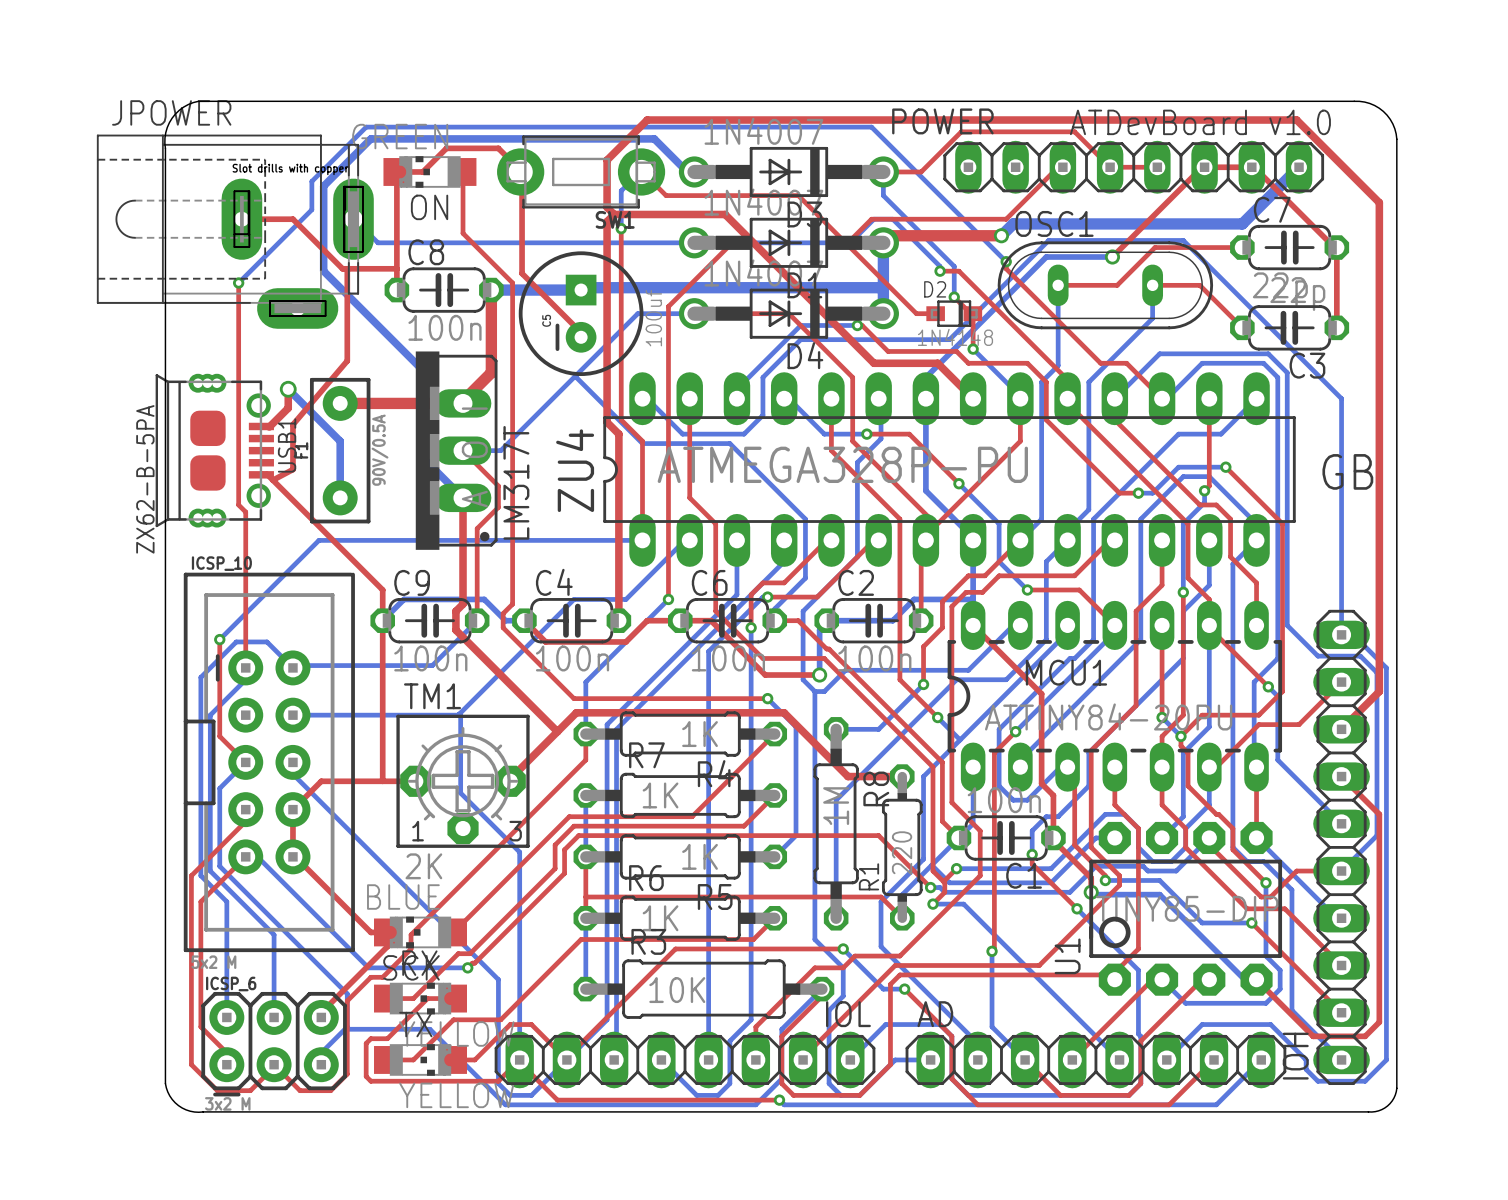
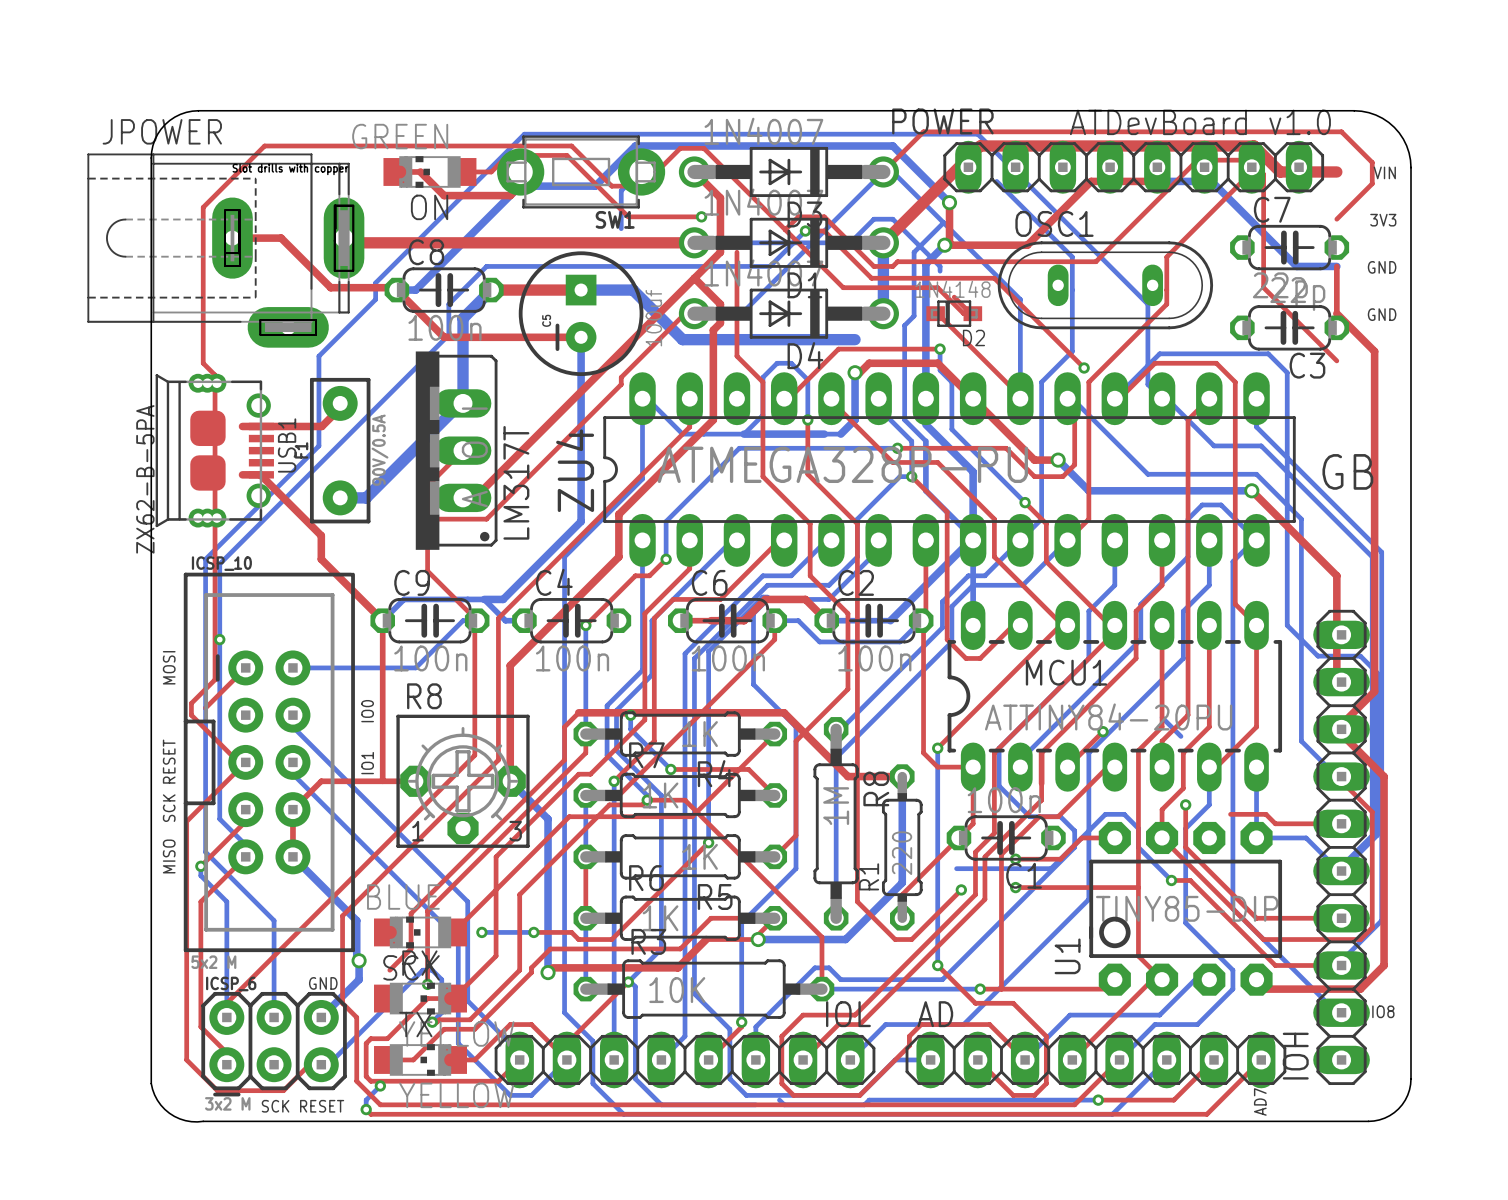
board edge: (198, 101) (1359, 101) (1369, 103) (1383, 111) (1392, 123) (1396, 139) (1396, 1088) (1390, 1103) (1381, 1109) (1371, 1112) (198, 1112) (190, 1111) (178, 1105) (169, 1095) (165, 1083) (164, 143) (165, 132) (172, 118) (183, 107) (198, 101) -> (198, 110) (180, 114) (165, 124) (154, 139) (151, 157) (151, 1083) (157, 1100) (169, 1113) (185, 1120) (197, 1121) (1368, 1121) (1384, 1118) (1402, 1104) (1407, 1095) (1410, 1078) (1410, 167) (1406, 145) (1399, 132) (1388, 122) (1375, 115) (1354, 110) (198, 110)
top track: (961, 131) (921, 171) (883, 171) -> (961, 131) (923, 131) (883, 171)
top track: (1074, 131) (1110, 167) (1157, 167) -> (1074, 131) (1341, 131) (1372, 162) (1372, 183) (1336, 219)
top track: (1062, 167) (1058, 167) (1006, 219) (871, 219) (846, 244) -> none
bottom track: (1299, 167) (1242, 223) (1013, 223) (1001, 235) -> none
top track: (397, 171) (396, 290) -> none
top track: (420, 171) (422, 171) (446, 148) (498, 148) (522, 171) (522, 273) (581, 332) (581, 337) -> (420, 171) (444, 195) (510, 195) (520, 186)
top track: (463, 171) (463, 233) (512, 282) (512, 604) -> (689, 427) (512, 604)
top track: none -> (463, 171) (491, 171) (507, 155) (566, 155) (628, 216) (701, 216)
top track: (641, 171) (666, 195) (798, 195) (916, 313) (935, 313) -> none
bottom track: (694, 171) (687, 171) (654, 138) (370, 138) (323, 186) (323, 271) (425, 372) (425, 460) (463, 497) -> none
text: none -> VIN (1384, 172)
bottom track: (883, 174) (883, 195) (954, 266) (954, 297) -> (883, 174) (895, 174) (1020, 299) (1020, 396)
top track: none -> (1147, 181) (1091, 181) (1027, 245) (944, 245) (949, 242) (949, 202)
bottom track: none -> (1147, 181) (1211, 181) (1296, 266) (1336, 266)
top track: none -> (1242, 181) (1166, 257) (1166, 304) (1088, 382) (1088, 519) (1067, 540)
bottom track: none -> (949, 202) (892, 146) (635, 146) (595, 186) (519, 186) (415, 290) (396, 290)
via: none -> (949, 202)
top track: (614, 214) (607, 221) (607, 422) (618, 434) (618, 514) -> (694, 278) (720, 304) (720, 323) (713, 330) (713, 419) (618, 514)
top track: (614, 214) (725, 214) (873, 363) -> (855, 372) (859, 372) (869, 363) (873, 363)
top track: (614, 214) (607, 207) (607, 160) (647, 120) (1296, 120) (1379, 202) (1379, 691) (1341, 729) -> none
top track: (241, 219) (292, 219) (342, 268) (396, 268) -> none
bottom track: (353, 219) (377, 242) (694, 242) -> none
text: none -> 3V3 (1383, 220)
bottom track: none -> (943, 222) (914, 252) (914, 316) (904, 325) (904, 419) (925, 441)
top track: (621, 228) (621, 377) -> (694, 313) (685, 313) (621, 377)
via position: (621, 228) -> (701, 216)
top track: none -> (785, 229) (798, 216) (824, 216) (873, 266) (892, 266) (897, 261) (1095, 261) (1197, 160) (1249, 160) (1263, 174) (1263, 287) (1336, 360)
JPOWER position: (235, 231) -> (225, 250)
top track: none -> (805, 231) (824, 231) (871, 278) (994, 278) (1084, 368)
via: none -> (805, 231)
top track: (890, 235) (1001, 235) -> (890, 235) (980, 146) (1254, 146) (1280, 171) (1336, 171)
via: (1001, 235) -> none
top track: none -> (232, 238) (281, 238) (330, 287) (394, 287) (444, 337) (581, 337)
top track: none -> (344, 238) (349, 242) (694, 242)
top track: (732, 242) (668, 306) (668, 599) -> none
via: none -> (944, 245)
top track: (1242, 247) (1154, 247) (1117, 285) (1058, 285) -> none
top track: none -> (736, 252) (736, 356) (762, 382) (762, 476) (810, 523) (810, 575) (847, 613) (847, 689) (796, 741) (796, 835) (774, 856)
top track: (1112, 257) (1202, 167) (1254, 167) (1334, 247) (1336, 247) (1336, 266) -> none
bottom track: (1112, 257) (1046, 257) (925, 377) -> (944, 245) (925, 264) (925, 377)
via: (1112, 257) -> none
top track: (1006, 261) (1006, 268) (1100, 363) (1126, 363) (1162, 398) -> none
bottom track: (1006, 261) (871, 127) (366, 127) (311, 181) (311, 209) (238, 282) -> none
via: (1006, 261) -> none
text: none -> GND (1382, 267)
top track: (347, 268) (347, 360) (292, 424) (292, 469) (272, 480) -> none
top track: (940, 271) (958, 271) (1067, 379) (1067, 403) (1188, 523) -> none
via: (940, 271) -> none
top track: (238, 282) (238, 504) (245, 512) (245, 667) -> (205, 708) (245, 667)
via: (238, 282) -> none
bottom track: (1058, 285) (1058, 365) -> (996, 181) (1072, 257) (1072, 351) (1058, 365)
top track: (1152, 285) (1199, 285) (1242, 327) -> none
bottom track: (1152, 285) (1152, 318) (1088, 382) (1088, 509) (1067, 530) (1067, 540) -> none
bottom track: (883, 287) (585, 287) (581, 290) (491, 290) -> (344, 497) (366, 497) (458, 405) (463, 403) (463, 318) (491, 290)
top track: (491, 290) (491, 372) (463, 403) (340, 403) -> (491, 290) (581, 290)
bottom track: none -> (581, 290) (633, 290) (682, 339) (800, 339)
via: (954, 297) -> none
top track: (694, 313) (788, 313) (852, 377) (852, 441) (935, 523) (925, 540) -> none
bottom track: (694, 313) (637, 313) (500, 450) (463, 450) -> (694, 313) (741, 313) (883, 171)
D2 rotation: 0° (954, 313) -> 180° (954, 313)
top track: (973, 313) (973, 349) -> none
text: none -> GND (1382, 314)
top track: (857, 325) (862, 325) (888, 351) (956, 351) (968, 363) (1027, 363) (1046, 382) (1046, 419) (1119, 493) (1138, 493) -> none
bottom track: (857, 325) (800, 325) (736, 389) (736, 398) -> none
via: (857, 325) -> none
bottom track: none -> (581, 337) (581, 521) (503, 599) (484, 599)
bottom track: (800, 339) (777, 363) -> (807, 419) (807, 379) (791, 363) (777, 363)
bottom track width: thin (800, 339) (855, 339) -> thick (800, 339) (855, 339)
bottom track: (855, 339) (949, 339) (1048, 240) (1183, 240) (1341, 398) (1341, 634) (1353, 634) (1386, 667) (1386, 1059) (1365, 1081) (1317, 1081) (1306, 1069) (1306, 1059) (1270, 1024) (1202, 1024) (1166, 1059) -> (642, 398) (642, 478) (564, 556) (564, 1012) (592, 1041) (592, 1083) (623, 1114) (1112, 1114) (1166, 1059)
top track: none -> (940, 349) (838, 349) (788, 398) (784, 398)
bottom track: none -> (940, 349) (940, 370) (951, 382) (951, 429) (1025, 502)
via: none -> (940, 349)
bottom track: (973, 349) (1020, 396) -> none
via: (973, 349) -> none
via: none -> (1084, 368)
via: none -> (855, 372)
bottom track: (575, 376) (642, 443) (729, 443) (805, 519) (805, 578) (774, 608) (774, 620) -> (921, 620) (899, 641) (819, 641) (798, 620) (774, 620)
top track: (621, 384) (621, 419) (642, 441) (642, 540) -> (621, 384) (498, 507)
top track: (288, 389) (288, 408) (269, 427) -> none
bottom track: (288, 389) (340, 441) (340, 497) -> none
via: (288, 389) -> none
bottom track: (784, 398) (788, 398) (824, 434) -> (744, 434) (824, 434)
bottom track: (878, 398) (881, 401) (881, 438) (857, 462) (857, 519) -> (878, 398) (878, 408) (911, 441) (911, 476) (899, 476) (857, 519)
top track: none -> (973, 398) (1034, 460) (1058, 460)
top track: (1020, 398) (1020, 441) (925, 535) (925, 540) -> (1020, 398) (1020, 396) (935, 313)
top track: none -> (1067, 398) (1074, 405) (1074, 464) (1062, 476) (1034, 476) (1006, 448) (897, 448)
bottom track: none -> (1067, 398) (1072, 398) (1147, 474) (1256, 474) (1301, 519) (1301, 741) (1336, 776)
top track: (1114, 398) (1114, 419) (1199, 504) (1216, 504) (1230, 519) (1230, 556) (1256, 582) (1256, 625) -> (1114, 398) (1119, 398) (1154, 363) (1216, 363) (1235, 382) (1235, 604) (1256, 625) (1256, 726)
bottom track: none -> (1162, 398) (1147, 384) (1147, 304) (977, 134) (524, 134) (375, 282) (375, 299) (318, 356) (318, 445) (205, 559) (205, 852) (219, 866)
bottom track: (1166, 398) (1202, 363) (1263, 363) (1277, 377) (1277, 658) (1254, 682) (1254, 764) (1256, 767) -> (1166, 398) (1214, 445) (1261, 445) (1372, 556) (1372, 835) (1336, 871) (1336, 868) (1306, 837) (1256, 837) (1256, 767)
top track: (1209, 398) (1209, 486) (1204, 490) -> (1209, 398) (1188, 419) (1188, 523)
bottom track: (1256, 398) (1221, 434) (1178, 434) (1093, 519) (1093, 639) (1074, 658) (1069, 658) (999, 729) (999, 748) -> (1256, 398) (1256, 427) (1381, 552) (1381, 920) (1336, 965)
top track: (831, 401) (831, 450) (899, 519) (899, 679) (937, 717) -> none
top track: none -> (344, 403) (321, 426) (242, 426)
top track: none -> (807, 419) (807, 474) (857, 523) (857, 901) (895, 939) (911, 939) (961, 889)
via: none -> (807, 419)
bottom track: (925, 424) (925, 441) -> (925, 424) (973, 471) (973, 538)
top track: (689, 427) (689, 497) (715, 523) (715, 611) (762, 658) (824, 658) (932, 767) (932, 871) (944, 882) (944, 892) (932, 904) -> none
bottom track: (840, 434) (866, 434) -> (840, 434) (855, 419) (855, 372)
top track: (866, 434) (909, 434) (937, 462) -> (831, 401) (892, 462) (937, 462)
via: (866, 434) -> none
bottom track: none -> (897, 448) (739, 448) (666, 521) (666, 559)
via: none -> (897, 448)
top track: (463, 450) (498, 486) (498, 507) -> (463, 450) (427, 486) (427, 571) (477, 620) (474, 620) (474, 755) (226, 1003) (226, 1017)
bottom track: none -> (1058, 460) (1088, 490) (1251, 490)
via: none -> (1058, 460)
top track: (1225, 467) (1282, 523) (1282, 691) (1258, 715) (1202, 715) (1180, 736) (1180, 745) (1188, 752) (1188, 786) (1232, 828) (1232, 849) (1265, 882) -> none
bottom track: (1225, 467) (1178, 467) (1152, 493) (1138, 493) -> none
via: (1225, 467) -> none
top track: (261, 474) (266, 474) (382, 589) (382, 620) -> (242, 474) (260, 474) (321, 535) (321, 559) (382, 620)
top track: none -> (911, 476) (947, 512) (947, 639) (966, 658) (980, 658) (1013, 625) (1020, 625)
via: none -> (911, 476)
top track: none -> (958, 483) (994, 519) (994, 556) (1062, 625)
bottom track: (958, 483) (999, 523) (999, 561) (1027, 589) -> none
via: (958, 483) -> none
bottom track: (1204, 490) (1204, 502) (1202, 504) -> (1232, 564) (1232, 561) (1254, 540) (1256, 540) (1221, 504) (1202, 504)
via: (1204, 490) -> none
top track: none -> (1251, 490) (1336, 575) (1336, 682)
via: none -> (1251, 490)
via: (1138, 493) -> none
top track: (463, 497) (463, 604) (455, 611) (455, 630) (557, 731) -> (463, 497) (474, 497) (720, 252) (720, 197) (694, 171)
top track: none -> (1025, 502) (1046, 523) (1046, 561) (1114, 630)
via: none -> (1025, 502)
top track: (486, 519) (477, 528) (477, 620) -> (486, 519) (427, 519)
bottom track: (1188, 519) (1183, 523) (1183, 592) -> (1188, 519) (1188, 556) (1140, 604)
bottom track: (642, 540) (318, 540) (219, 639) -> (642, 540) (642, 670) (607, 705) (607, 724)
top track: none -> (689, 540) (689, 568) (644, 613) (644, 719) (590, 774) (578, 774) (496, 856) (496, 956) (453, 998)
bottom track: (689, 540) (685, 540) (625, 599) (574, 599) (458, 715) (292, 715) -> none
bottom track: (736, 540) (736, 594) (607, 724) -> (736, 540) (732, 540) (651, 620) (651, 675) (616, 710) (616, 729)
top track: none -> (784, 540) (779, 540) (720, 599) (673, 599) (654, 618) (654, 741) (614, 781)
bottom track: (784, 540) (784, 561) (616, 729) -> none
top track: (831, 540) (826, 540) (784, 582) (762, 582) (751, 594) (751, 627) -> none
bottom track: none -> (831, 540) (826, 540) (791, 575) (762, 575) (685, 653) (685, 1036) (661, 1059)
top track: (878, 540) (873, 540) (817, 597) (767, 597) -> none
bottom track: none -> (878, 540) (878, 549) (829, 599) (767, 599) (753, 613) (753, 684) (767, 698)
top track: (925, 540) (921, 545) (921, 620) -> (925, 540) (925, 615) (921, 620) (923, 620) (923, 646)
top track: (1020, 540) (984, 575) (968, 575) (942, 601) (942, 627) (923, 646) -> none
top track: (1114, 540) (1110, 540) (1074, 575) (999, 575) (982, 592) (966, 592) (951, 606) (951, 802) (980, 830) (980, 875) (899, 956) (855, 956) (843, 967) (814, 967) (755, 1026) (755, 1059) -> none
top track: (618, 556) (618, 620) -> none
top track: none -> (666, 559) (649, 575) (635, 575) (585, 625)
bottom track: (1046, 561) (1046, 639) (1006, 679) (956, 679) (836, 800) -> (1046, 561) (1022, 585) (973, 585) (951, 606) (951, 641) (836, 757) (836, 800)
bottom track: (1232, 564) (1256, 540) (1256, 523) (1209, 476) (1183, 476) (1140, 519) (1140, 604) -> none
top track: (1188, 578) (1209, 599) (1209, 625) -> none
bottom track: (829, 585) (803, 611) (803, 679) (814, 691) -> none
top track: (1027, 589) (1079, 589) (1114, 625) -> (1015, 731) (1114, 632) (1114, 625)
via: (1027, 589) -> none
top track: (1183, 592) (1183, 715) (1162, 736) (1162, 741) -> (1188, 578) (1188, 715) (1162, 741)
via: (1183, 592) -> none
via: (767, 597) -> none
bottom track: (668, 599) (585, 682) -> (585, 625) (585, 682)
via position: (668, 599) -> (666, 559)
bottom track: (973, 599) (914, 599) (892, 620) (890, 620) -> (973, 540) (970, 540) (890, 620)
top track: (503, 613) (503, 627) (574, 698) (767, 698) -> (503, 613) (498, 618) (498, 760) (342, 915) (342, 1003) (356, 1017) (356, 1081) (380, 1104) (977, 1104)
bottom track: (477, 620) (432, 665) (292, 665) (292, 667) (266, 641) (236, 641) (200, 677) (200, 866) -> (477, 620) (463, 620) (415, 667) (292, 667)
top track: (524, 620) (545, 641) (625, 641) (647, 620) (680, 620) -> none
top track: (710, 620) (765, 675) (819, 675) -> (710, 620) (744, 620) (765, 599) (805, 599) (826, 620)
top track: (774, 620) (798, 620) (942, 762) (942, 821) (958, 837) -> (774, 620) (774, 639) (618, 795) (585, 795)
bottom track: (826, 620) (819, 630) (819, 675) -> none
via: none -> (585, 625)
top track: (973, 625) (1041, 693) (1041, 752) -> (1136, 658) (1041, 752)
bottom track: (1020, 625) (1013, 625) (968, 670) (845, 670) (824, 691) (814, 691) -> none
top track: none -> (1067, 625) (1060, 625) (937, 748)
bottom track: (1067, 625) (1067, 632) (923, 776) (923, 859) (881, 901) (881, 946) (977, 1043) (977, 1059) -> none
bottom track: (1114, 625) (1114, 632) (1088, 658) -> (1114, 540) (1114, 585) (1088, 611) (1088, 658)
bottom track: (1209, 625) (1209, 726) (1183, 752) (1183, 816) (1162, 837) -> none
bottom track: (751, 627) (751, 1019) (729, 1041) -> (829, 585) (767, 585) (694, 658) (694, 993) (729, 1029) (729, 1041)
via: (751, 627) -> none
top track: (1209, 627) (1268, 686) -> (1209, 627) (1209, 726) (1183, 752) (1183, 788) (1162, 809) (1162, 837) (1263, 939) (1360, 939) (1372, 927) (1372, 811) (1336, 776)
top track: (219, 639) (219, 736) (245, 762) -> none
top track: (1136, 658) (1136, 705) (1091, 750) (1091, 847) (1119, 875) (1119, 885) (1039, 965) (895, 965) (803, 1057) (803, 1059) -> (1041, 783) (1041, 800) (984, 856) (984, 899) (859, 1024) (838, 1024) (803, 1059)
text: none -> MOSI (169, 667)
bottom track: (245, 667) (245, 679) (210, 715) (210, 871) (274, 934) -> none
via: (819, 675) -> none
top track: (1341, 682) (1299, 724) (1258, 724) (1256, 726) -> none
bottom track: (923, 684) (878, 729) (840, 729) -> (1020, 540) (984, 575) (968, 575) (942, 601) (942, 627) (840, 729)
via: (923, 684) -> none
bottom track: (1268, 686) (1277, 696) (1277, 760) (1341, 823) -> none
via: (1268, 686) -> none
bottom track: (814, 691) (814, 939) (843, 967) (843, 996) (829, 1010) (829, 1083) (840, 1095) -> none
TM1 name: TM1 (432, 696) -> R8 (424, 696)
via: (767, 698) -> none
text: none -> IO0 (367, 711)
top track: (578, 712) (576, 712) (510, 778) -> (618, 556) (510, 665) (510, 778)
bottom track: (459, 713) (460, 793) (519, 852) (519, 1052) -> (292, 715) (292, 726) (467, 901) (467, 1000) (519, 1052)
bottom track: none -> (630, 715) (630, 729) (670, 769)
via: none -> (630, 715)
bottom track: (937, 717) (960, 739) -> none
via position: (937, 717) -> (937, 748)
via: (1162, 717) -> none
via: (1015, 731) -> none
via: none -> (1103, 731)
via: (1180, 736) -> none
bottom track: (616, 750) (616, 1057) (614, 1059) -> (614, 781) (614, 1059)
top track: (585, 752) (585, 760) (411, 934) -> (578, 712) (564, 726) (564, 760) (411, 913) (411, 934)
top track: none -> (585, 752) (427, 911) (427, 984)
bottom track: (607, 755) (607, 1019) (566, 1059) -> (607, 755) (647, 795) (647, 800)
text: none -> RESET (169, 761)
bottom track: (245, 762) (219, 788) -> (805, 231) (770, 266) (486, 266) (448, 304) (448, 334) (219, 564) (219, 788)
text: none -> IO1 (367, 763)
bottom track: (973, 767) (973, 823) (902, 894) (902, 918) -> none
top track: (1067, 767) (1074, 774) (1074, 845) (1105, 875) (1105, 880) -> (1067, 767) (1103, 731)
bottom track: (1067, 767) (1060, 767) (1027, 800) (1013, 800) -> (1046, 816) (1029, 816) (1013, 800)
top track: (1114, 767) (1114, 804) (1138, 828) -> (1162, 717) (1162, 726) (1138, 750) (1138, 828)
top track: none -> (1114, 767) (1107, 767) (1058, 816) (1039, 816) (1001, 854) (1001, 989)
top track: (1162, 767) (1162, 804) (1185, 828) -> (1185, 804) (1185, 828)
top track: (1256, 767) (1256, 837) -> none
via: none -> (670, 769)
bottom track: none -> (902, 776) (902, 882) (845, 939) (758, 939)
top track: (1341, 776) (1379, 814) (1379, 1022) (1365, 1036) (1313, 1036) (1265, 989) -> (1336, 313) (1374, 351) (1374, 691) (1336, 729) (1384, 776) (1384, 965) (1360, 989) (1265, 989)
bottom track: none -> (510, 781) (548, 819) (548, 972)
via: none -> (614, 781)
top track: (1041, 783) (1053, 795) (1053, 840) (1091, 878) (1091, 892) -> none
bottom track: (1088, 786) (1058, 816) -> (755, 1059) (755, 1026) (814, 967) (829, 967) (840, 979) (942, 979) (1074, 847) (1074, 830) (1060, 816) (1058, 816)
top track: (774, 795) (744, 826) (574, 826) (555, 845) (555, 868) (470, 953) (458, 953) (413, 998) (389, 998) -> (774, 795) (748, 769) (670, 769)
via: none -> (647, 800)
via: none -> (1185, 804)
text: none -> SCK (169, 808)
top track: none -> (1230, 814) (1265, 814) (1275, 823) (1336, 823)
bottom track: (1046, 816) (1032, 830) (1032, 854) -> none
bottom track: (219, 819) (219, 866) -> (219, 819) (245, 845) (245, 856)
top track: (994, 833) (994, 948) (992, 951) -> (994, 833) (975, 852) (975, 894) (855, 1015) (803, 1015)
top track: (578, 835) (878, 835) (930, 887) -> (578, 835) (609, 804) (642, 804) (647, 800) (685, 800) (821, 937) (821, 989)
bottom track: (796, 835) (774, 856) -> (796, 835) (796, 868) (741, 922) (741, 1022)
top track: none -> (1114, 837) (1081, 837) (1060, 859) (1015, 859)
bottom track: (1114, 837) (1095, 837) (1051, 882) (949, 882) (931, 865) -> none
top track: (1209, 837) (1209, 845) (1261, 897) (1270, 897) (1296, 871) (1341, 871) -> none
bottom track: (1209, 837) (1176, 871) (1147, 871) (1143, 866) (1095, 866) (1069, 892) (944, 892) (940, 887) (930, 887) -> none
bottom track: (1256, 837) (1336, 918) (1341, 918) -> none
top track: none -> (708, 842) (611, 939)
bottom track: (708, 842) (708, 1059) -> (937, 748) (937, 965)
via: none -> (708, 842)
bottom track: (1185, 847) (1171, 861) (1152, 861) -> (1171, 880) (1152, 861)
bottom track: (1232, 847) (1247, 861) (1263, 861) (1291, 889) (1291, 1010) (1341, 1059) -> (1232, 847) (1232, 908) (1336, 1012)
top track: (564, 849) (564, 873) (474, 963) (467, 967) -> (564, 849) (519, 894) (519, 970) (470, 1019)
top track: (1032, 854) (1032, 863) (1077, 908) -> none
via position: (1032, 854) -> (1015, 859)
text: none -> MISO (169, 856)
bottom track: (245, 856) (257, 856) (368, 967) (467, 967) -> none
top track: (292, 856) (295, 856) (370, 932) (387, 932) (387, 946) (321, 1012) (321, 1017) -> none
bottom track: none -> (292, 856) (356, 920) (356, 958) (359, 960) (359, 979) (321, 1017)
top track: (200, 866) (191, 875) (191, 1064) -> (970, 313) (963, 313) (937, 287) (843, 287) (703, 148) (680, 148) (642, 186) (611, 186) (571, 146) (264, 146) (203, 207) (203, 363) (215, 375) (215, 679) (191, 703) (191, 715) (241, 764) (245, 762) (186, 821) (186, 1059) (191, 1064)
via: none -> (200, 866)
TM1 value: 2K (423, 866) -> none
top track: (956, 868) (943, 881) -> none
via: (956, 868) -> none
bottom track: (1105, 880) (1159, 880) (1202, 922) (1251, 922) -> none
via: (1105, 880) -> none
top track: none -> (1171, 880) (1190, 880) (1275, 965) (1336, 965)
via: none -> (1171, 880)
bottom track: (1265, 882) (1265, 956) (1280, 970) (1280, 989) (1265, 1003) (1185, 1003) (1162, 979) -> none
via: (1265, 882) -> none
via: (930, 887) -> none
top track: none -> (1015, 887) (1138, 887)
via: none -> (1015, 887)
via: none -> (961, 889)
bottom track: (1091, 892) (1093, 894) (1159, 894) (1244, 979) (1256, 979) -> none
via: (1091, 892) -> none
top track: (585, 897) (881, 897) (902, 918) -> (923, 684) (923, 752) (937, 767) (973, 767) (973, 823) (902, 894) (902, 918)
bottom track: (932, 904) (963, 904) (1119, 1059) -> (1185, 847) (1185, 922) (1232, 970) (1232, 989) (1197, 1024) (1154, 1024) (1119, 1059)
via: (932, 904) -> none
bottom track: (1077, 908) (1138, 970) (1140, 1083) (1129, 1095) (968, 1095) (951, 1078) (951, 1036) (940, 1024) -> (1088, 786) (1088, 899) (963, 1024) (940, 1024)
via: (1077, 908) -> none
top track: (1247, 908) (1284, 908) (1341, 965) -> (1247, 908) (1256, 918) (1336, 918)
bottom track: (274, 920) (347, 993) (347, 1026) (321, 1052) (321, 1064) -> (274, 920) (274, 934)
top track: (1251, 922) (1341, 1012) -> none
via: (1251, 922) -> none
bottom track: none -> (481, 932) (533, 932)
via: none -> (481, 932)
via: none -> (533, 932)
bottom track: (458, 939) (498, 979) (498, 1083) -> (458, 939) (458, 1043) (498, 1083)
top track: (581, 939) (552, 967) -> (581, 939) (571, 932) (533, 932)
top track: (611, 939) (706, 939) -> (552, 967) (677, 967) (706, 939)
via: none -> (758, 939)
top track: (675, 948) (566, 1057) (566, 1059) -> (628, 982) (559, 1050) (566, 1059)
top track: none -> (675, 948) (550, 948) (531, 967) (531, 972) (474, 1029) (444, 1029)
top track: (680, 948) (843, 948) -> (680, 948) (710, 918) (774, 918)
bottom track: (843, 948) (883, 989) -> (821, 989) (883, 989)
via: (843, 948) -> none
top track: (1138, 948) (1112, 974) (1114, 979) (1110, 974) (899, 974) (890, 984) (890, 1064) -> (1025, 1059) (989, 1024) (921, 1024) (909, 1036) (909, 1045) (890, 1064)
top track: none -> (1138, 948) (1138, 956) (1162, 979)
bottom track: (992, 951) (992, 1026) (1025, 1059) -> (1209, 979) (1195, 979) (1159, 1015) (1069, 1015) (1025, 1059)
via: (992, 951) -> none
via: none -> (359, 960)
top track: none -> (937, 965) (975, 1003) (1013, 1003) (1046, 1036) (1046, 1083) (1034, 1095) (1013, 1095) (977, 1059)
via: none -> (937, 965)
via: (467, 967) -> none
top track: (389, 970) (382, 977) (370, 977) (347, 1000) (347, 1074) (330, 1090) (300, 1090) (274, 1064) (274, 1067) (250, 1090) -> (321, 1064) (309, 1064) (283, 1090) (250, 1090)
top track: (548, 972) (500, 1019) (470, 1019) -> none
via: none -> (548, 972)
top track: none -> (1114, 979) (1105, 989) (980, 989)
top track: (1209, 979) (1202, 979) (1140, 1041) (1140, 1083) (1129, 1095) (1060, 1095) (1025, 1059) -> none
via: none -> (628, 982)
text: none -> GND (323, 983)
via: none -> (427, 984)
top track: (821, 989) (821, 996) (803, 1015) -> none
bottom track: (821, 989) (781, 1029) (781, 1078) (755, 1104) -> none
top track: (904, 989) (951, 1036) (951, 1078) (977, 1104) -> none
bottom track: none -> (904, 989) (980, 989)
via: (904, 989) -> none
via: none -> (980, 989)
text: none -> IO8 (1383, 1011)
top track: (453, 1019) (444, 1029) -> (453, 1019) (439, 1019) (432, 1022)
bottom track: none -> (432, 1022) (441, 1012) (441, 979) (432, 970) (422, 970) (328, 1064) (321, 1064)
via: none -> (432, 1022)
top track: none -> (741, 1022) (741, 1026) (708, 1059)
via: none -> (741, 1022)
bottom track: (346, 1028) (429, 1029) (505, 1104) (661, 1104) -> (616, 750) (661, 795) (661, 948) (628, 982) (635, 986) (635, 1078) (661, 1104)
top track: (519, 1059) (519, 1062) (557, 1100) (779, 1100) -> none
bottom track: (661, 1059) (696, 1095) (718, 1095) (729, 1083) (729, 1078) -> (840, 1095) (746, 1095) (729, 1078)
top track: none -> (1119, 1059) (1074, 1104)
top track: none -> (1261, 1059) (1206, 1114) (370, 1114) (366, 1109)
bottom track: (1261, 1059) (1216, 1104) (864, 1104) -> (1098, 1100) (869, 1100) (864, 1104)
bottom track: none -> (380, 1085) (366, 1100) (366, 1109)
via: none -> (380, 1085)
via: (779, 1100) -> none
via: none -> (1098, 1100)
top track: (1173, 1100) (1169, 1104) (1074, 1104) -> (1173, 1100) (1098, 1100)
text: none -> AD7 (1260, 1101)
text: none -> SCK (275, 1106)
text: none -> RESET (322, 1106)
via: none -> (366, 1109)

